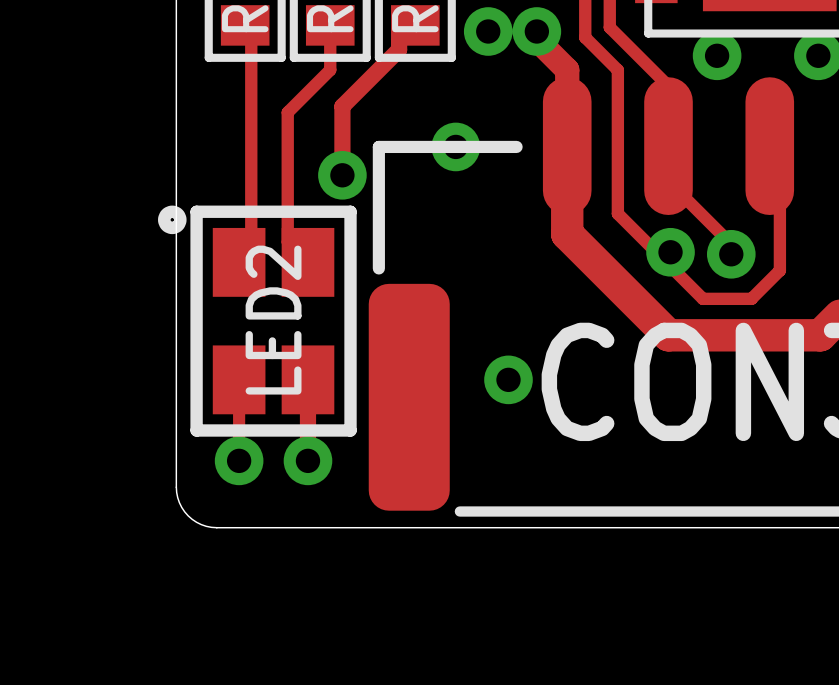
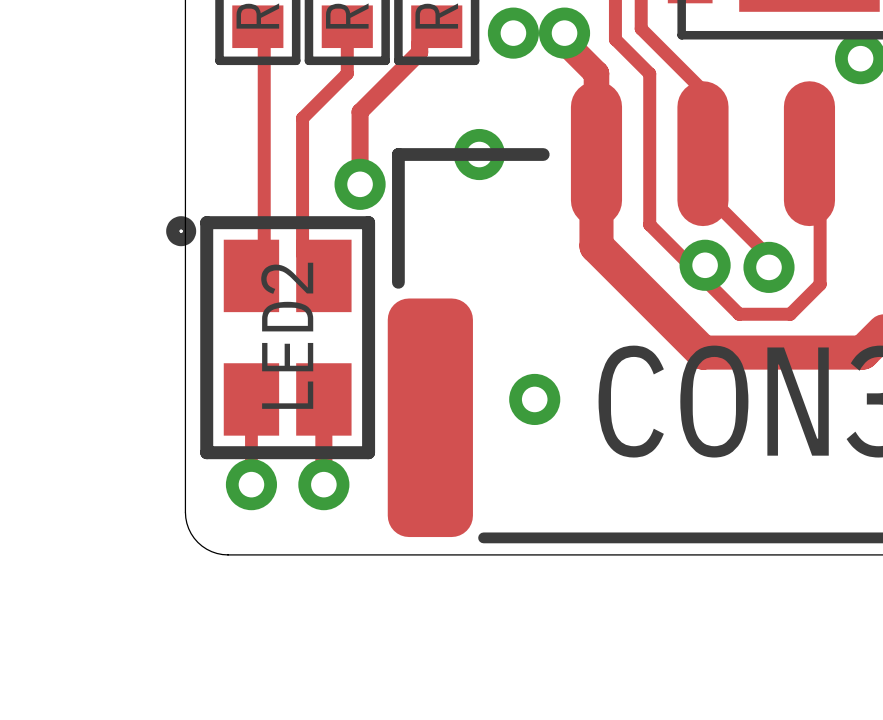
via: (717, 55) -> none

